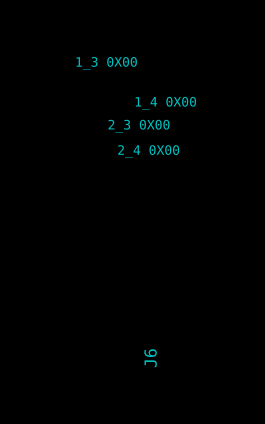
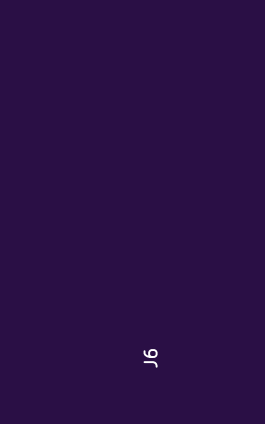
text: 1_3 0X00 (106, 63) -> none
text: 1_4 0X00 (165, 103) -> none
text: 2_3 0X00 (139, 126) -> none
text: 2_4 0X00 (148, 151) -> none

